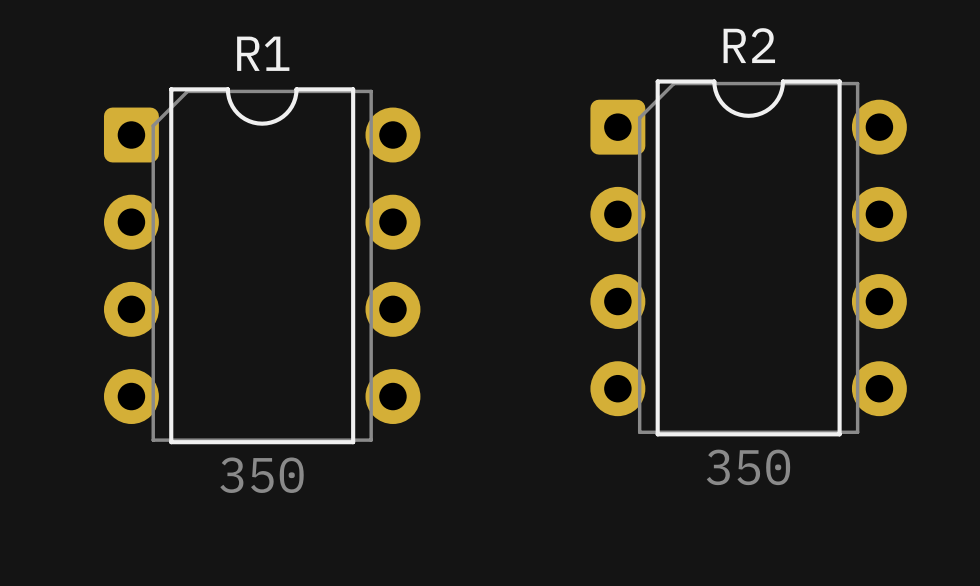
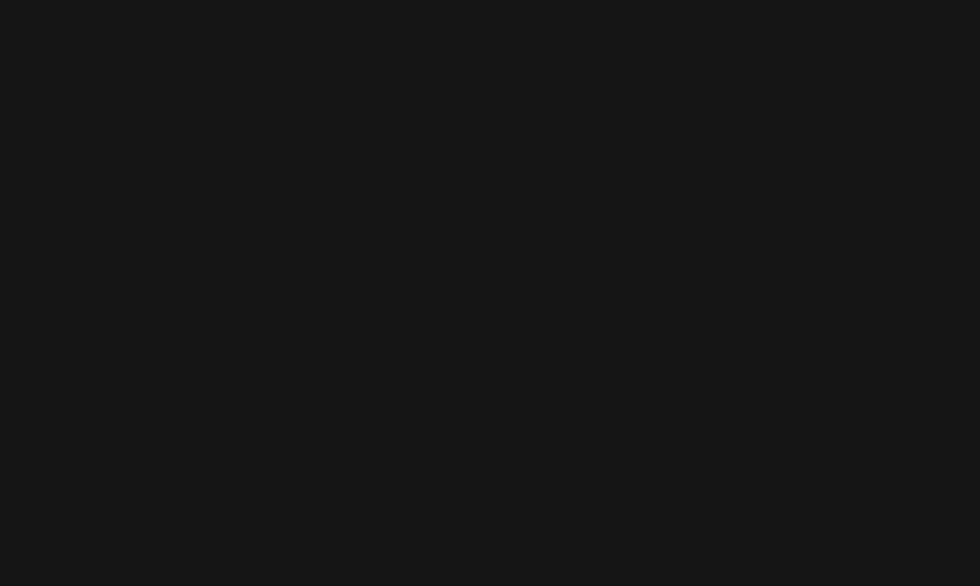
R2: 350 (748, 257) -> none
R1: 350 (262, 265) -> none

